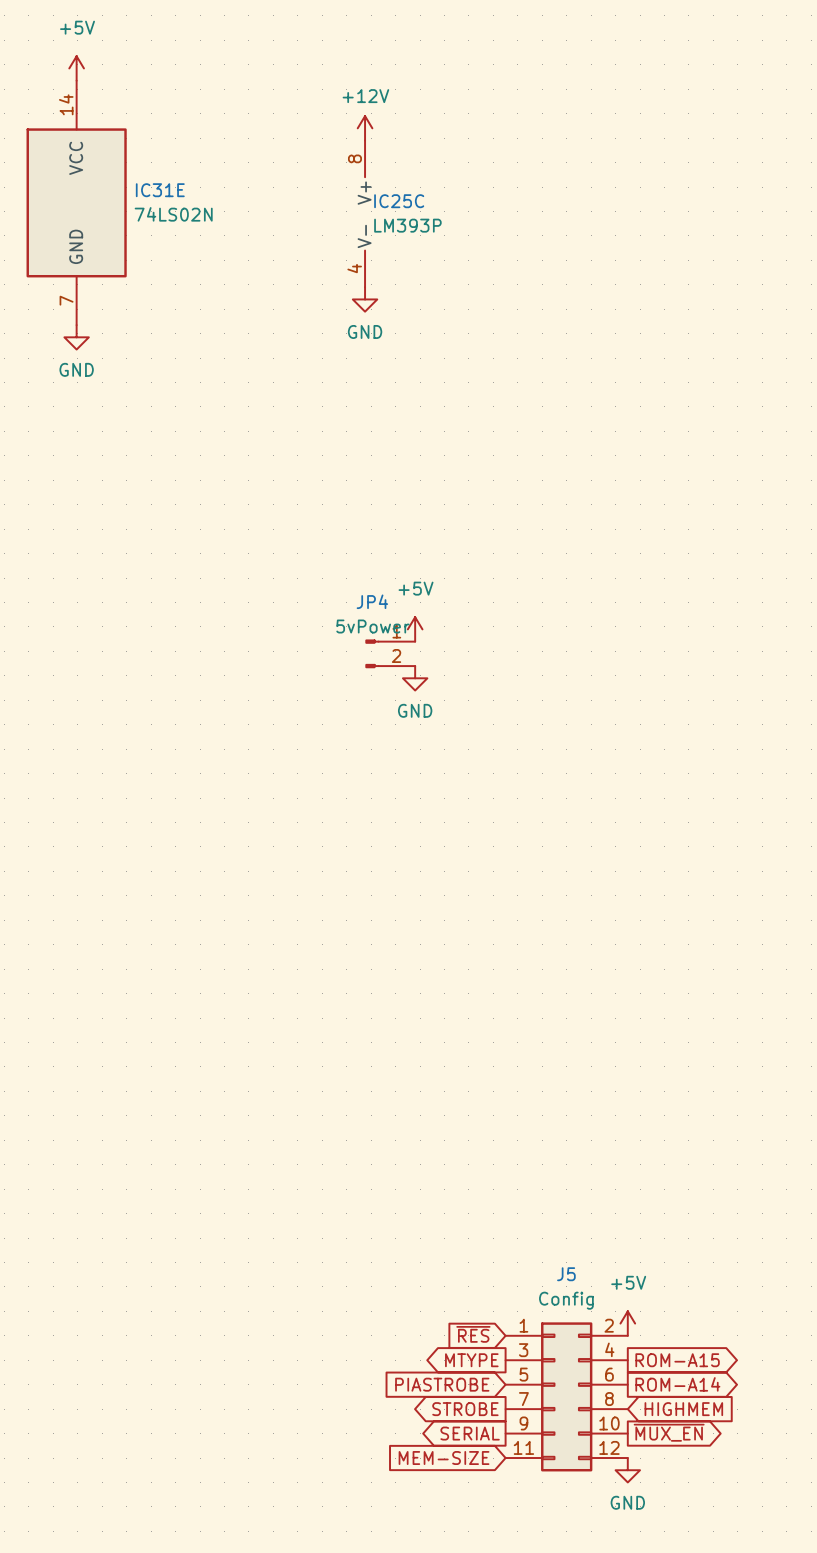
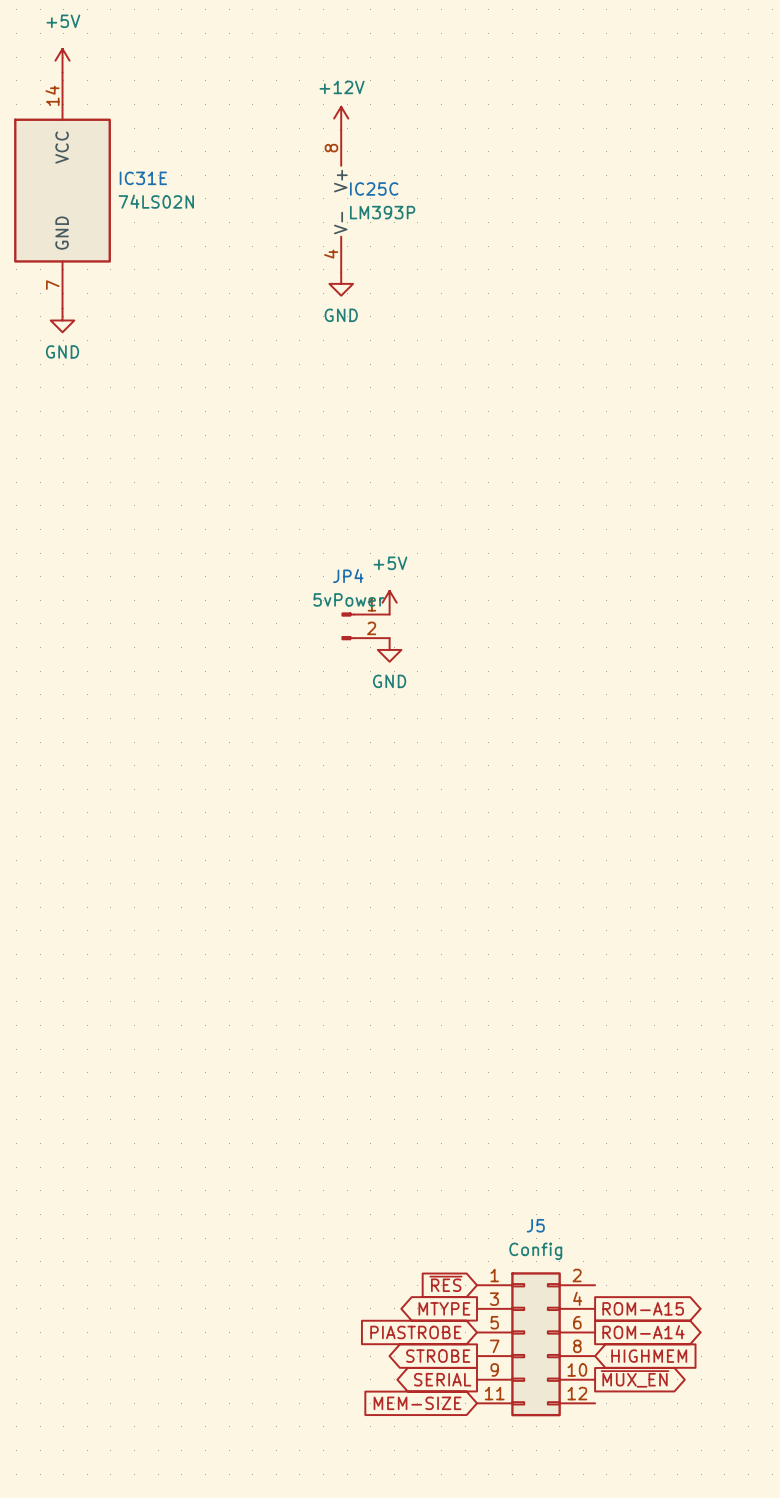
power symbol: +5V (627, 1323) -> none
power symbol: GND (627, 1470) -> none

